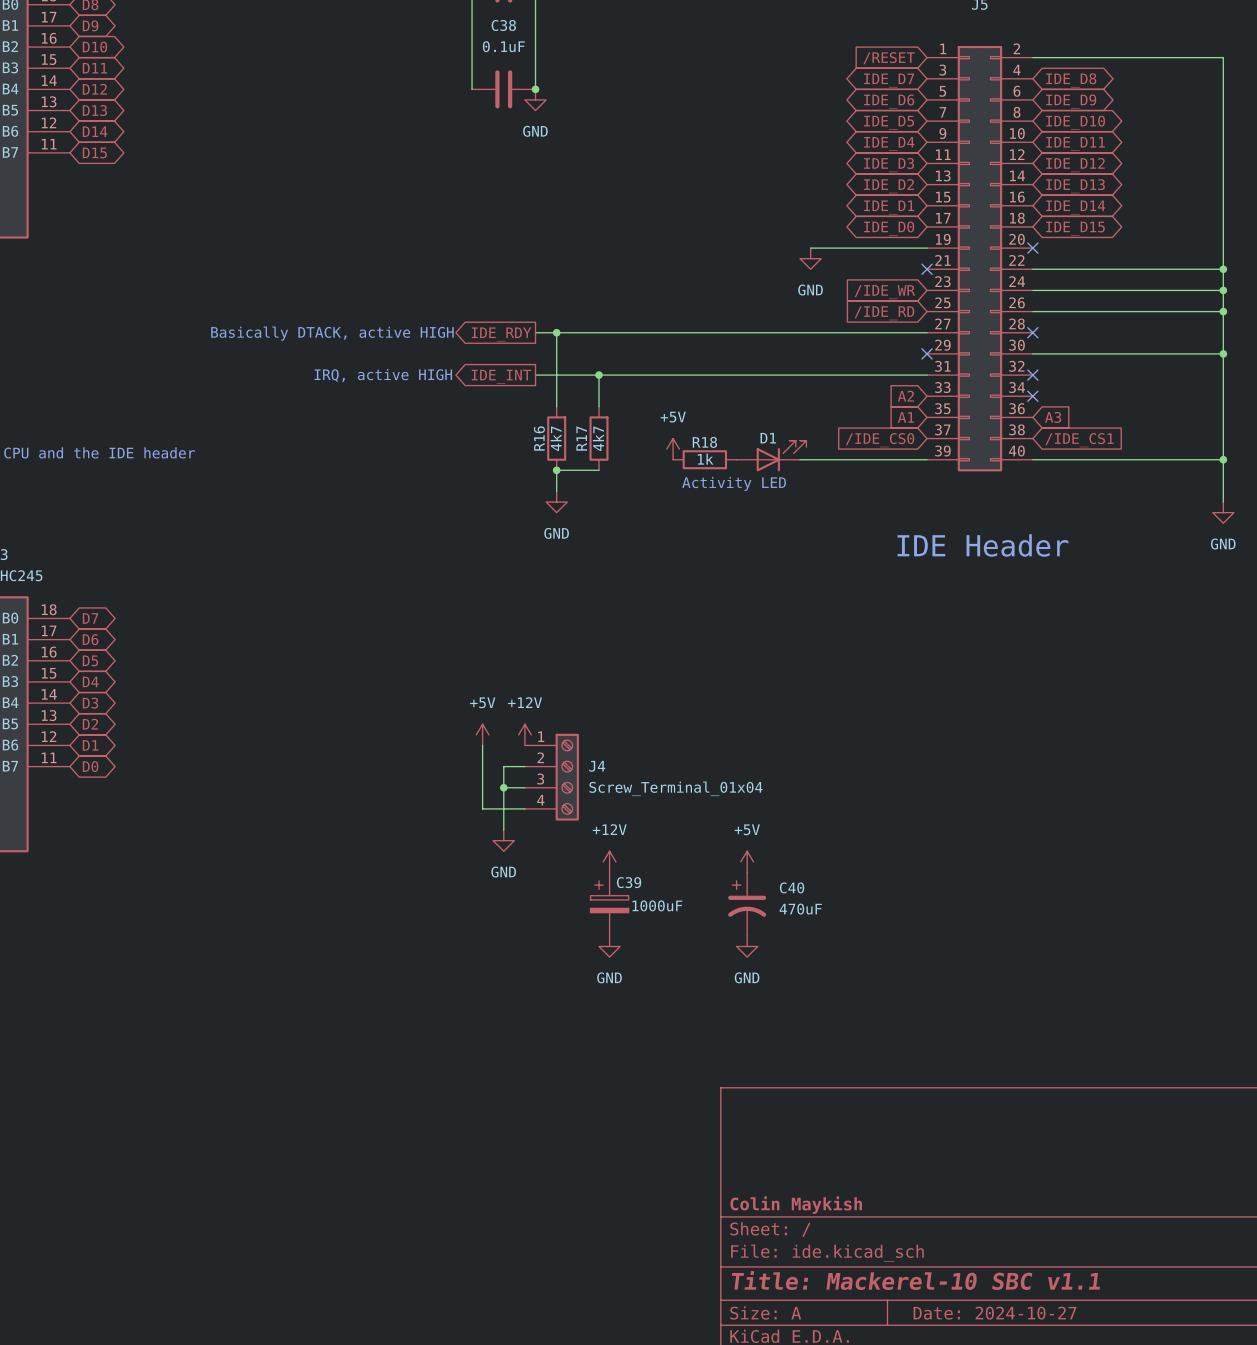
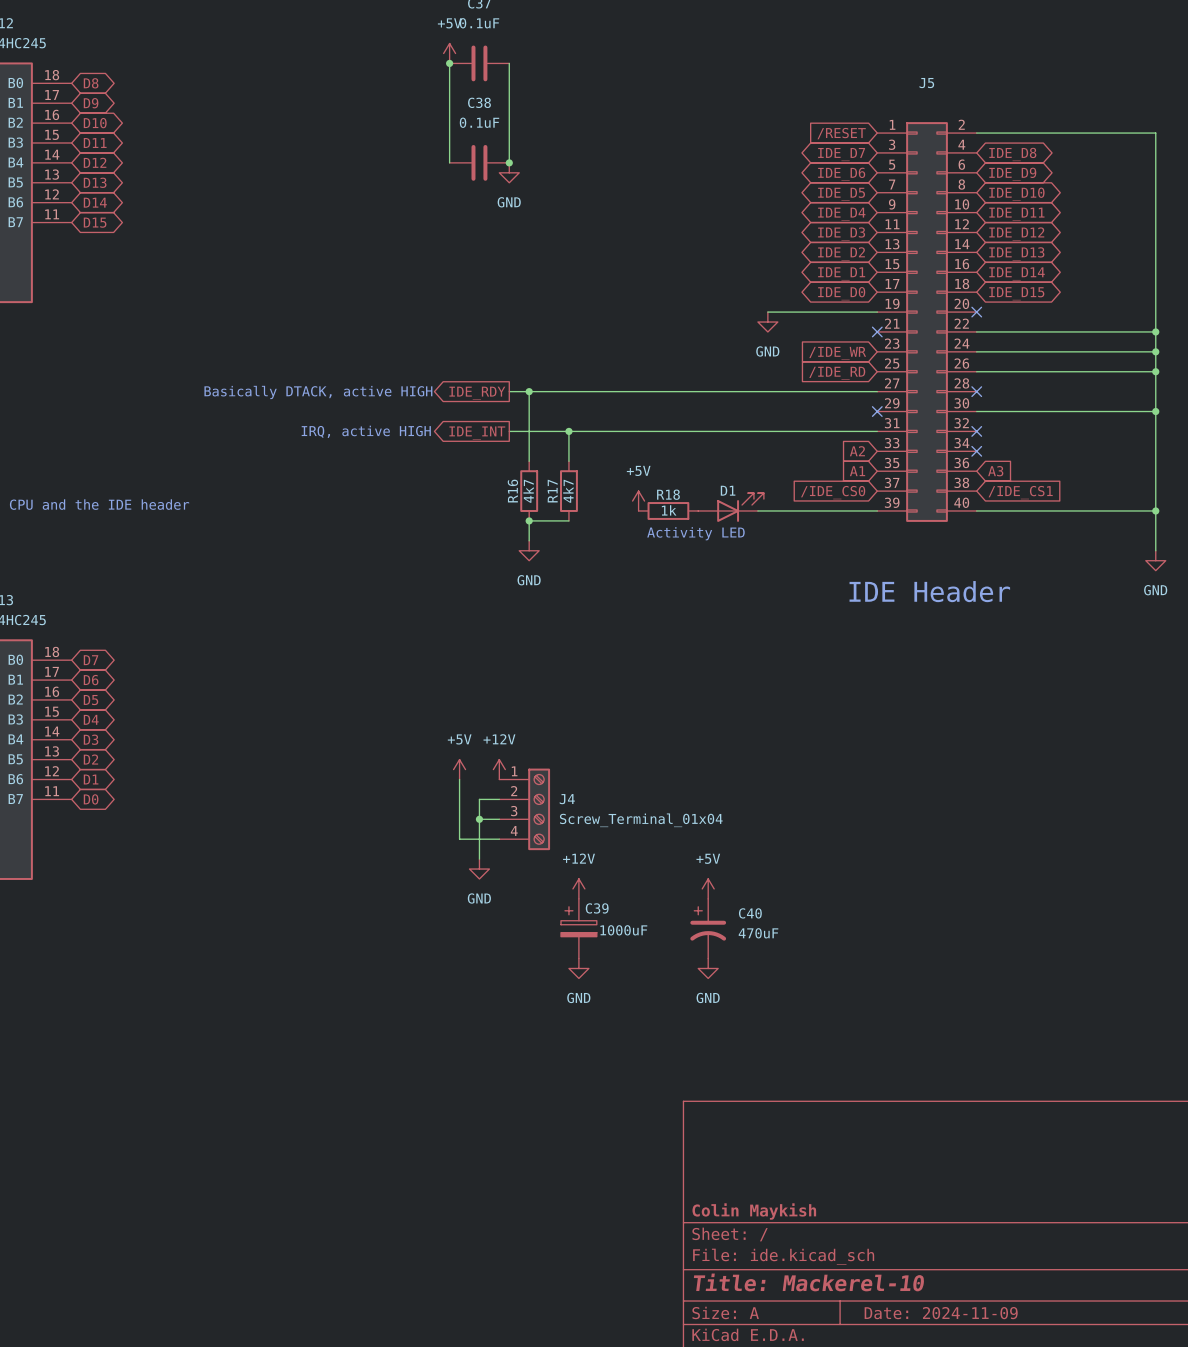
title block: Title: Mackerel-10 SBC v1.1 (915, 1280) -> Title: Mackerel-10 (809, 1282)
title block: Date: 2024-10-27 (994, 1313) -> Date: 2024-11-09 (941, 1313)

